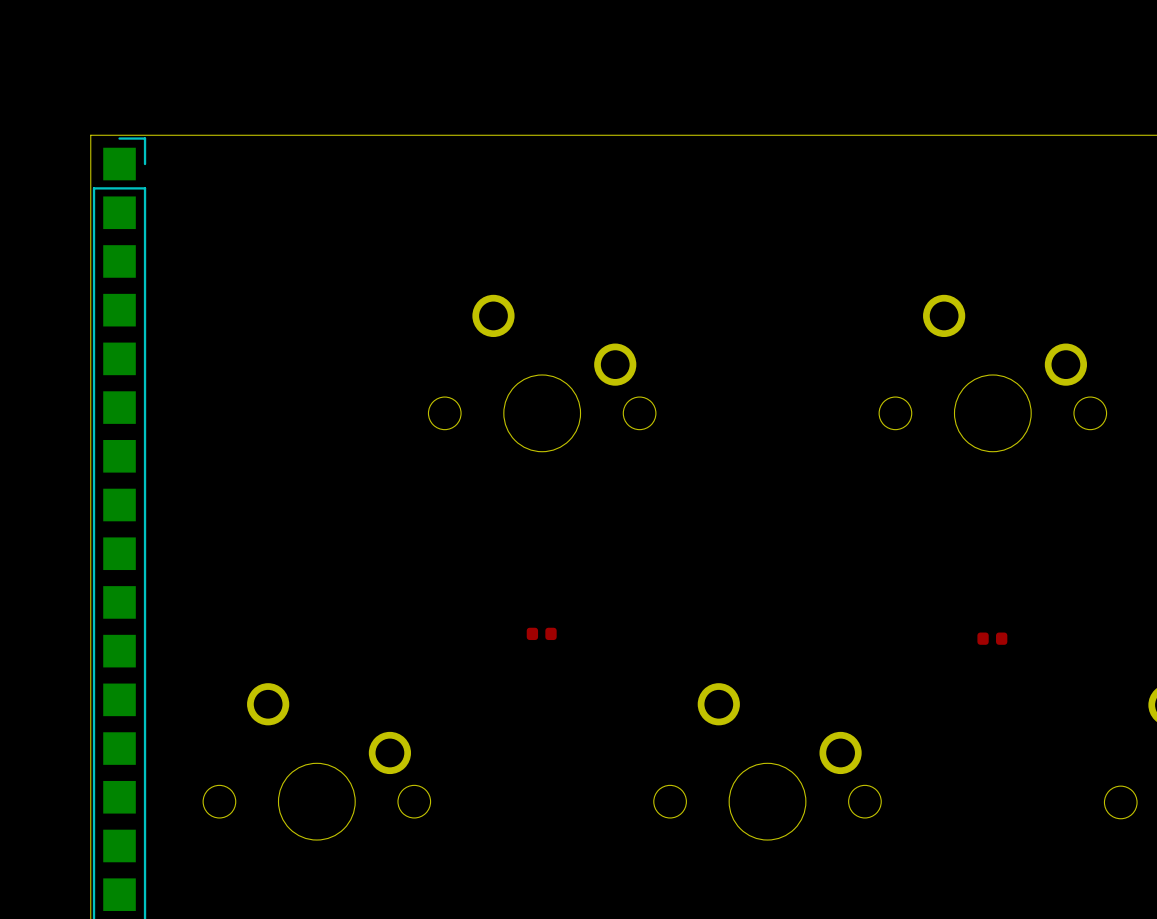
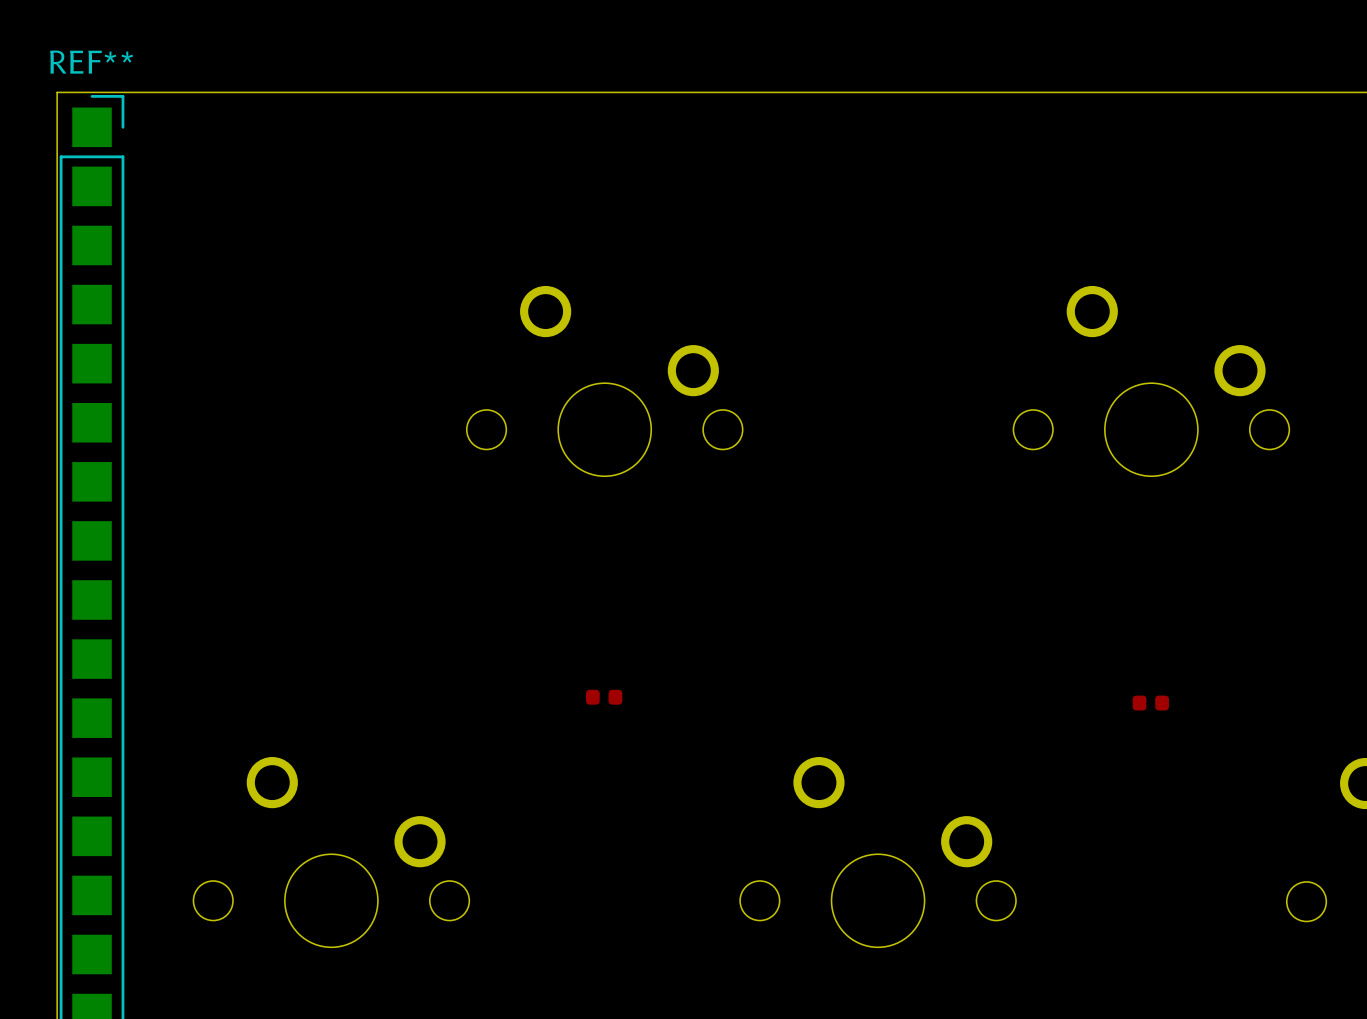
REF** name: none -> REF** (91, 62)

